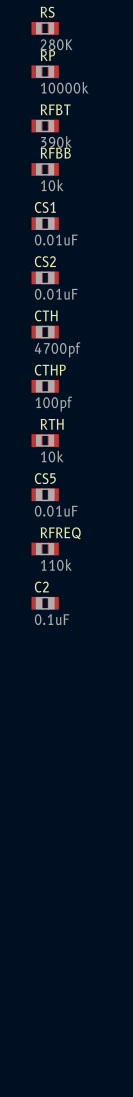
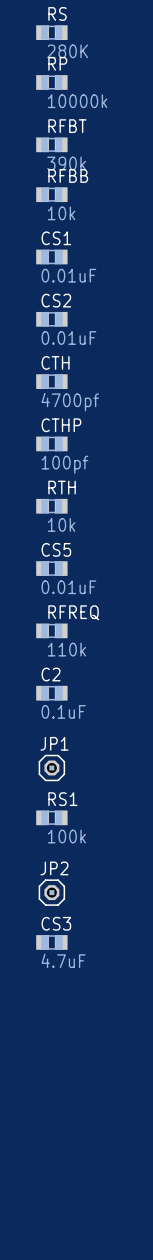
JP1: none -> (51, 767)
RS1: none -> 100k (51, 817)
JP2: none -> (51, 892)
CS3: none -> 4.7uF (51, 942)

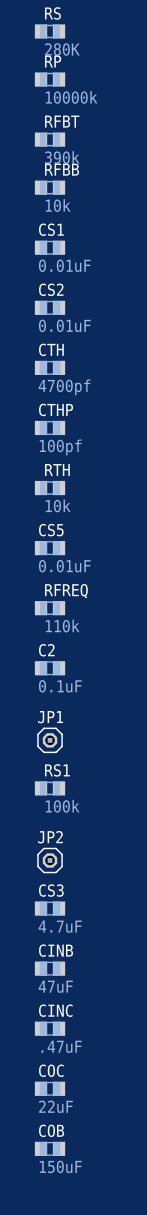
CINB: none -> 47uF (50, 968)
CINC: none -> .47uF (50, 1028)
COC: none -> 22uF (50, 1088)
COB: none -> 150uF (50, 1148)

